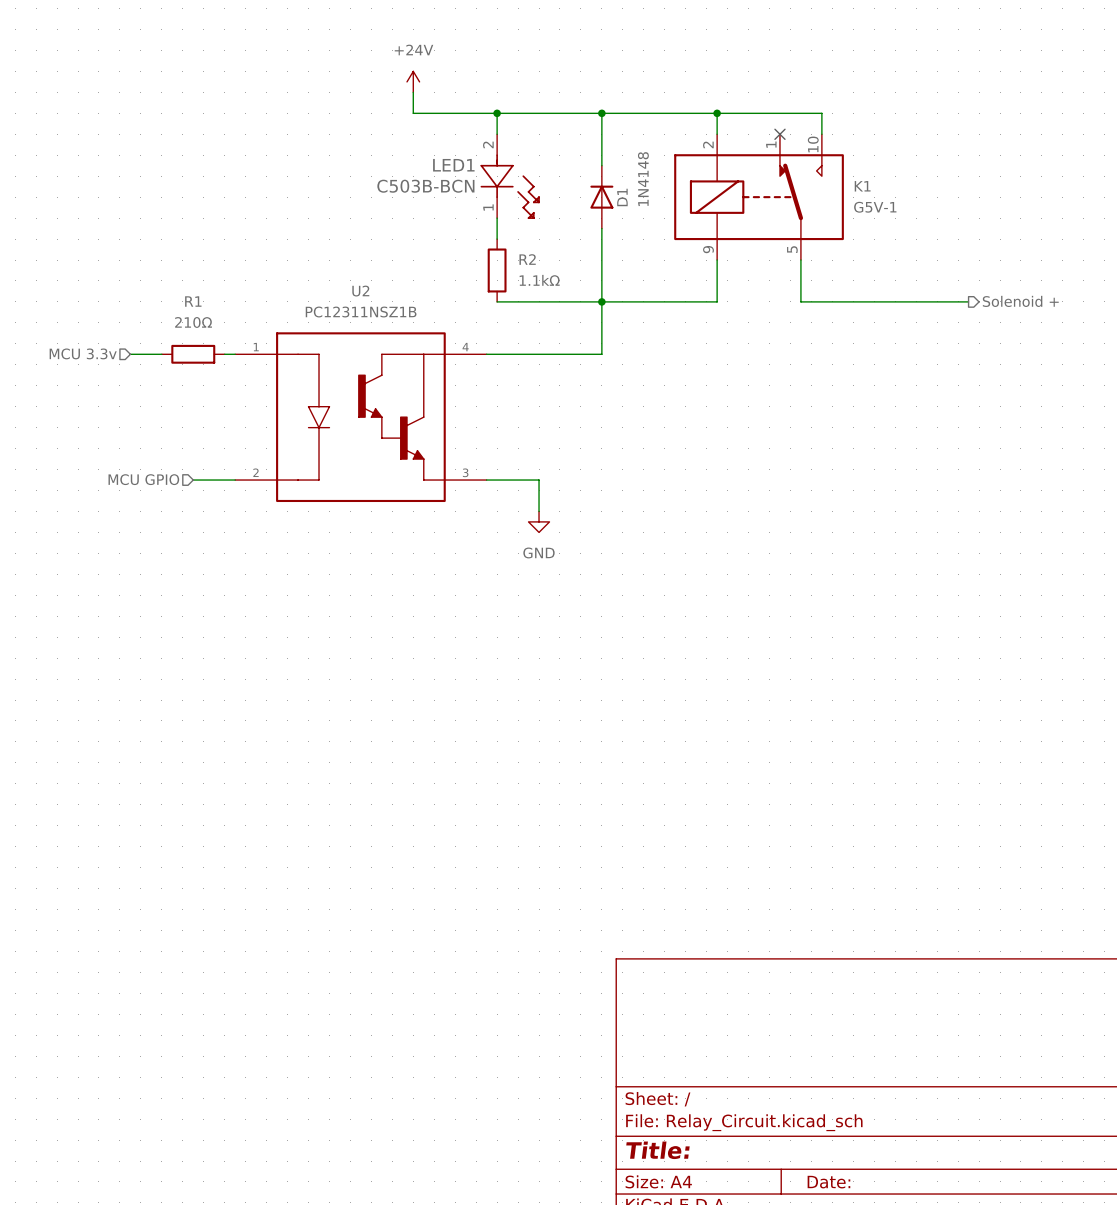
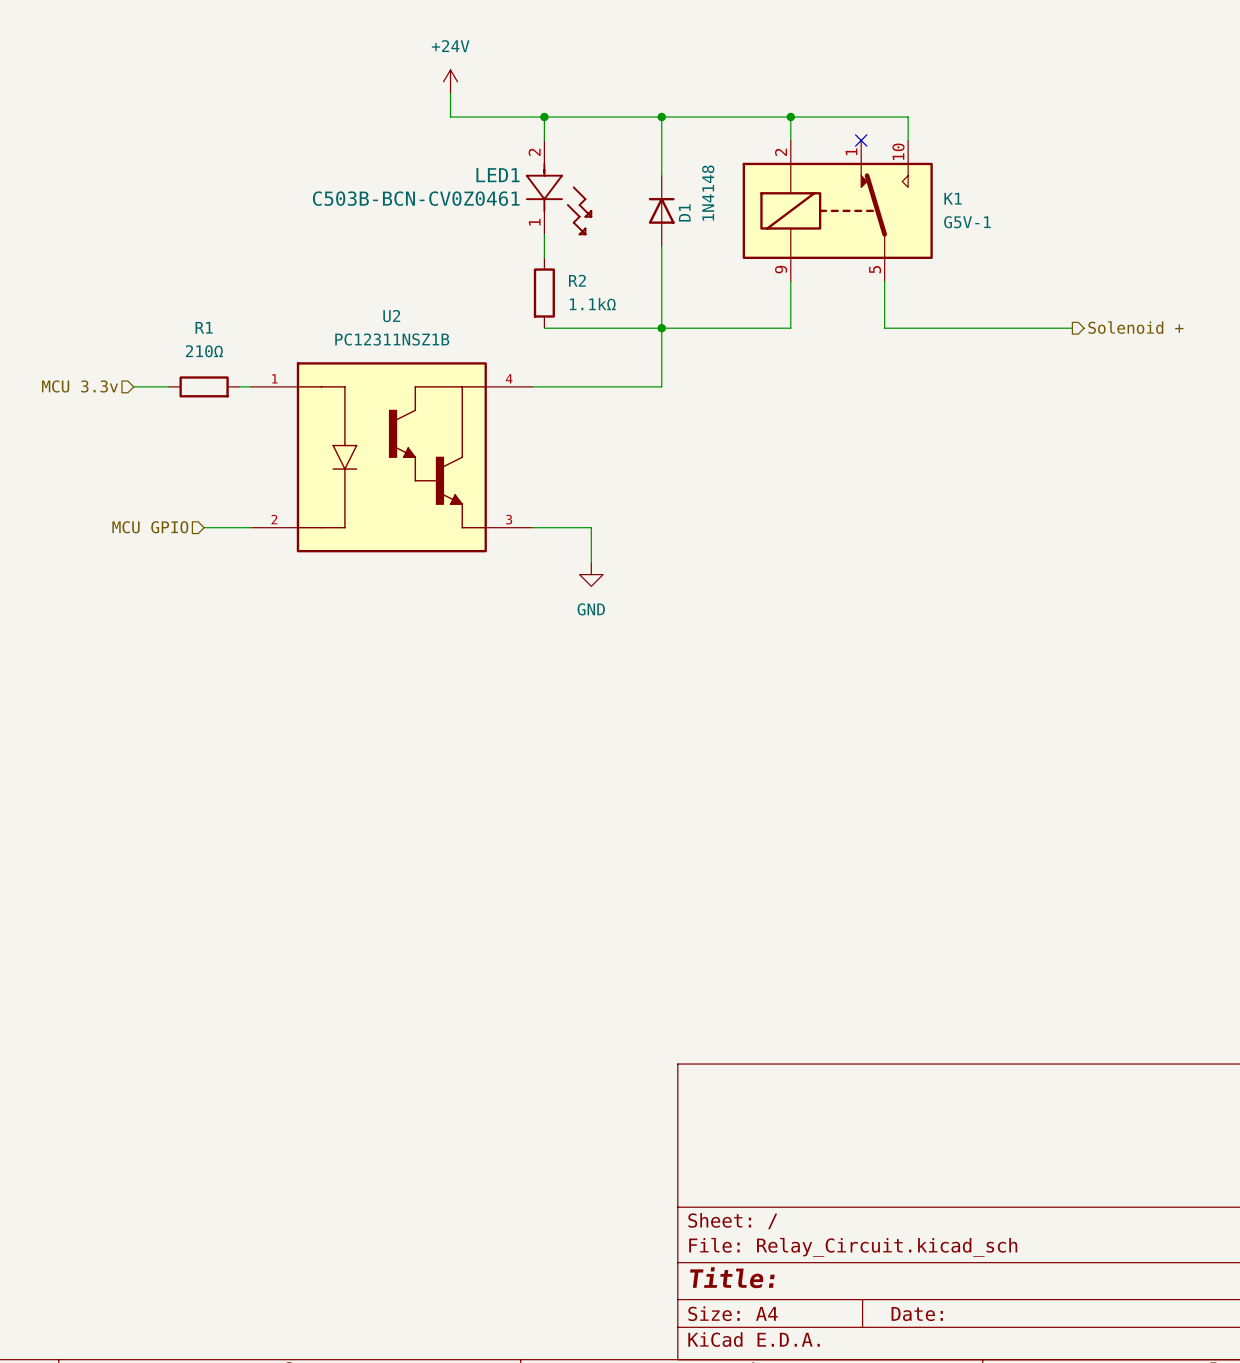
LED1 value: C503B-BCN (425, 186) -> C503B-BCN-CV0Z0461 (416, 198)

